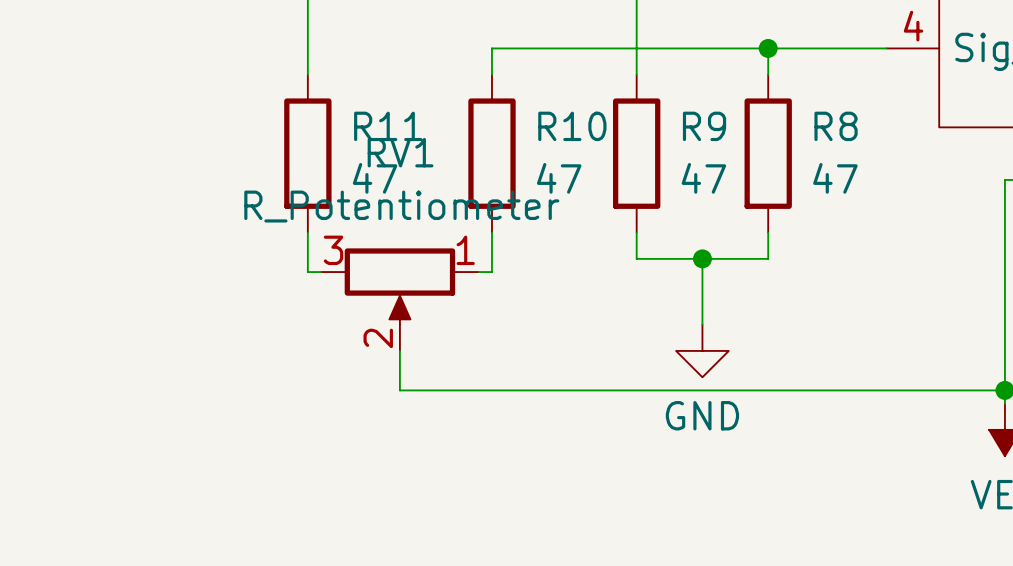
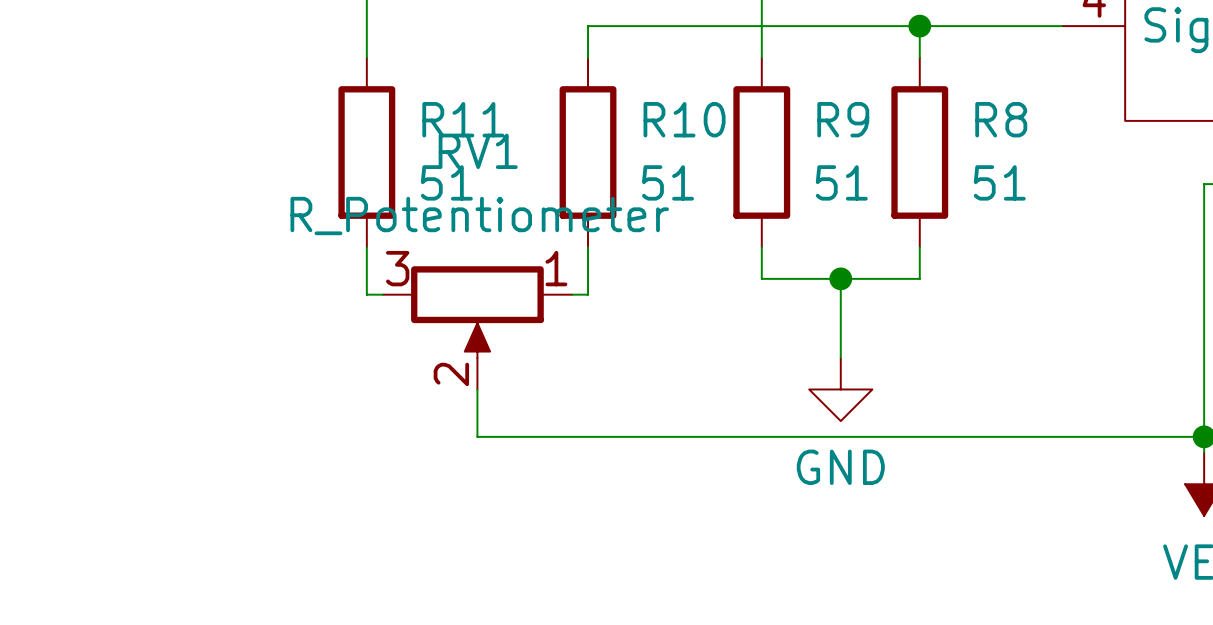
R11 value: 47 (375, 178) -> 51 (446, 182)
R10 value: 47 (559, 178) -> 51 (668, 182)
R9 value: 47 (703, 178) -> 51 (841, 182)
R8 value: 47 (835, 178) -> 51 (999, 182)

